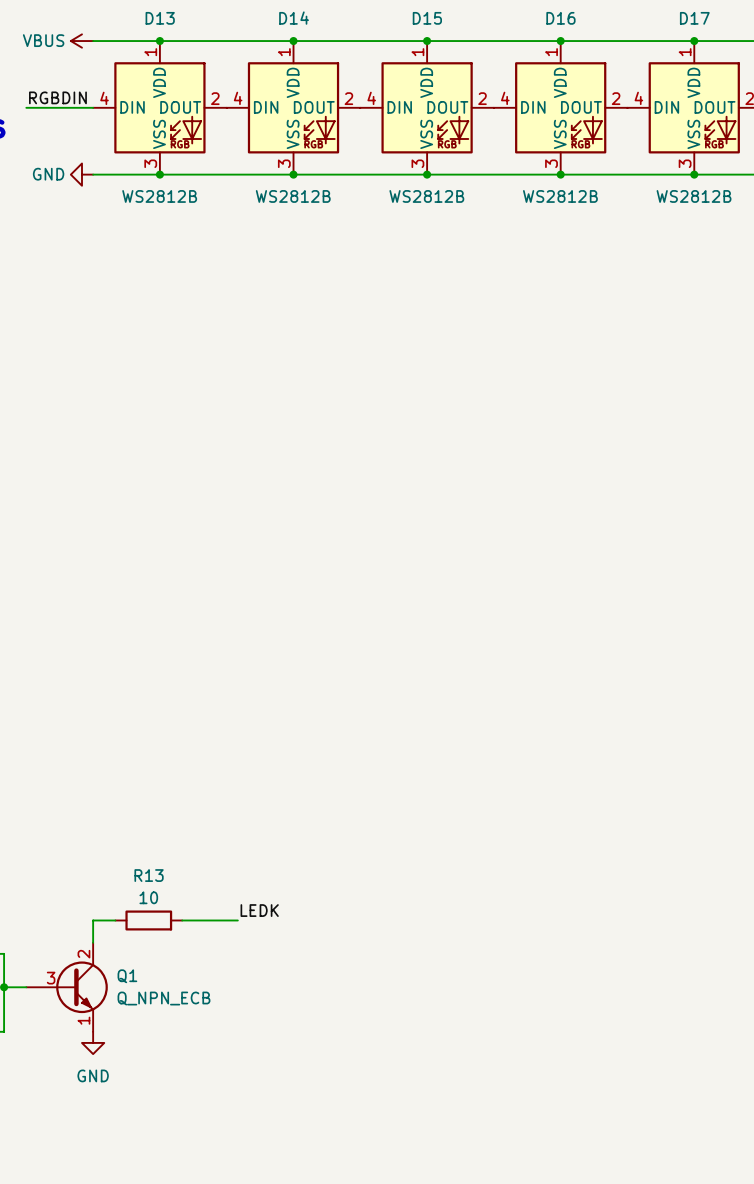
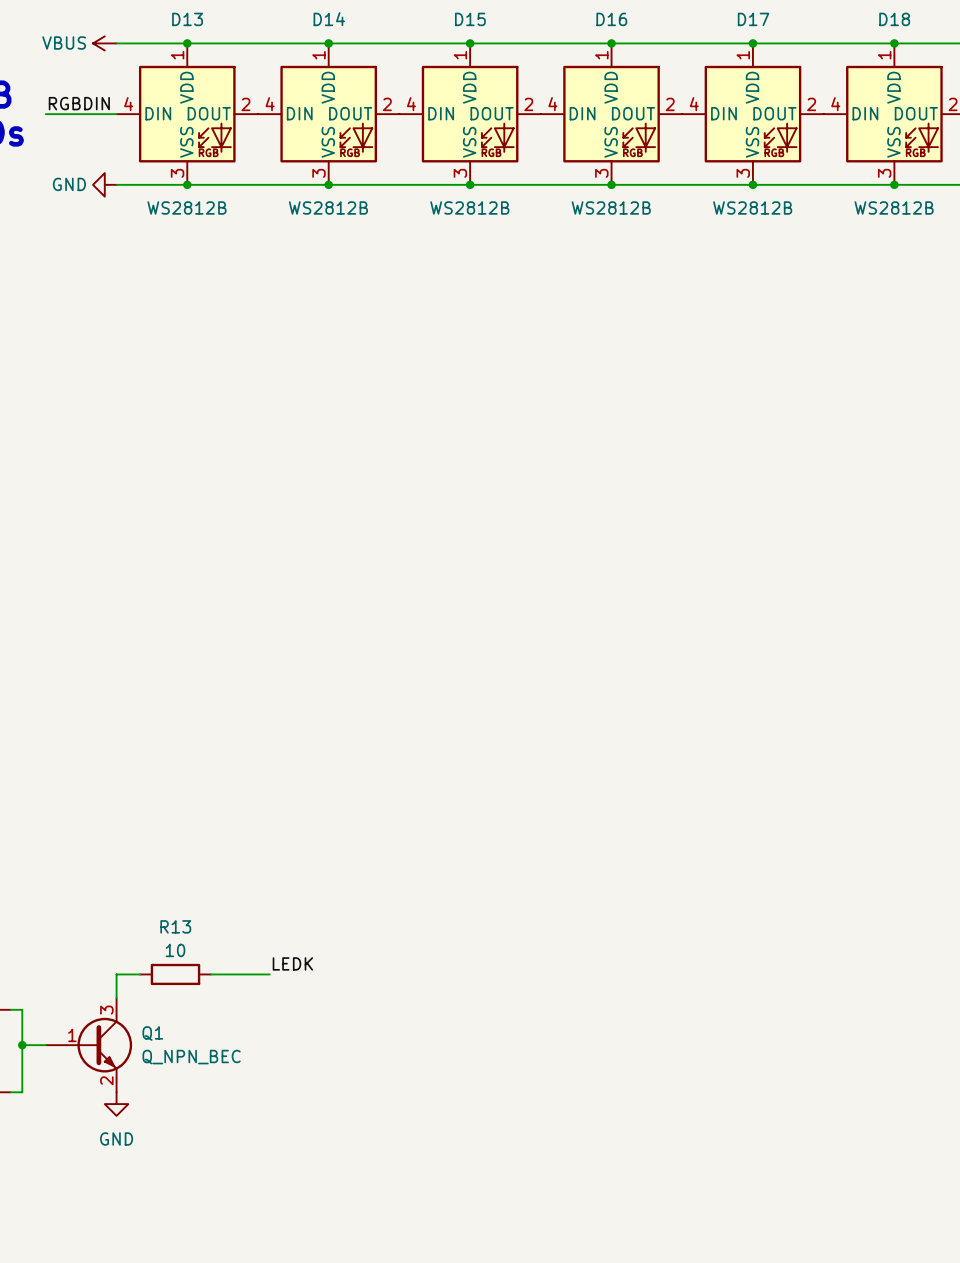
Q1 pin number: 2 (83, 954) -> 3 (106, 1010)
Q1 pin number: 3 (51, 978) -> 1 (72, 1035)
Q1 value: Q_NPN_ECB (163, 998) -> Q_NPN_BEC (191, 1057)
Q1 pin number: 1 (83, 1020) -> 2 (106, 1080)

